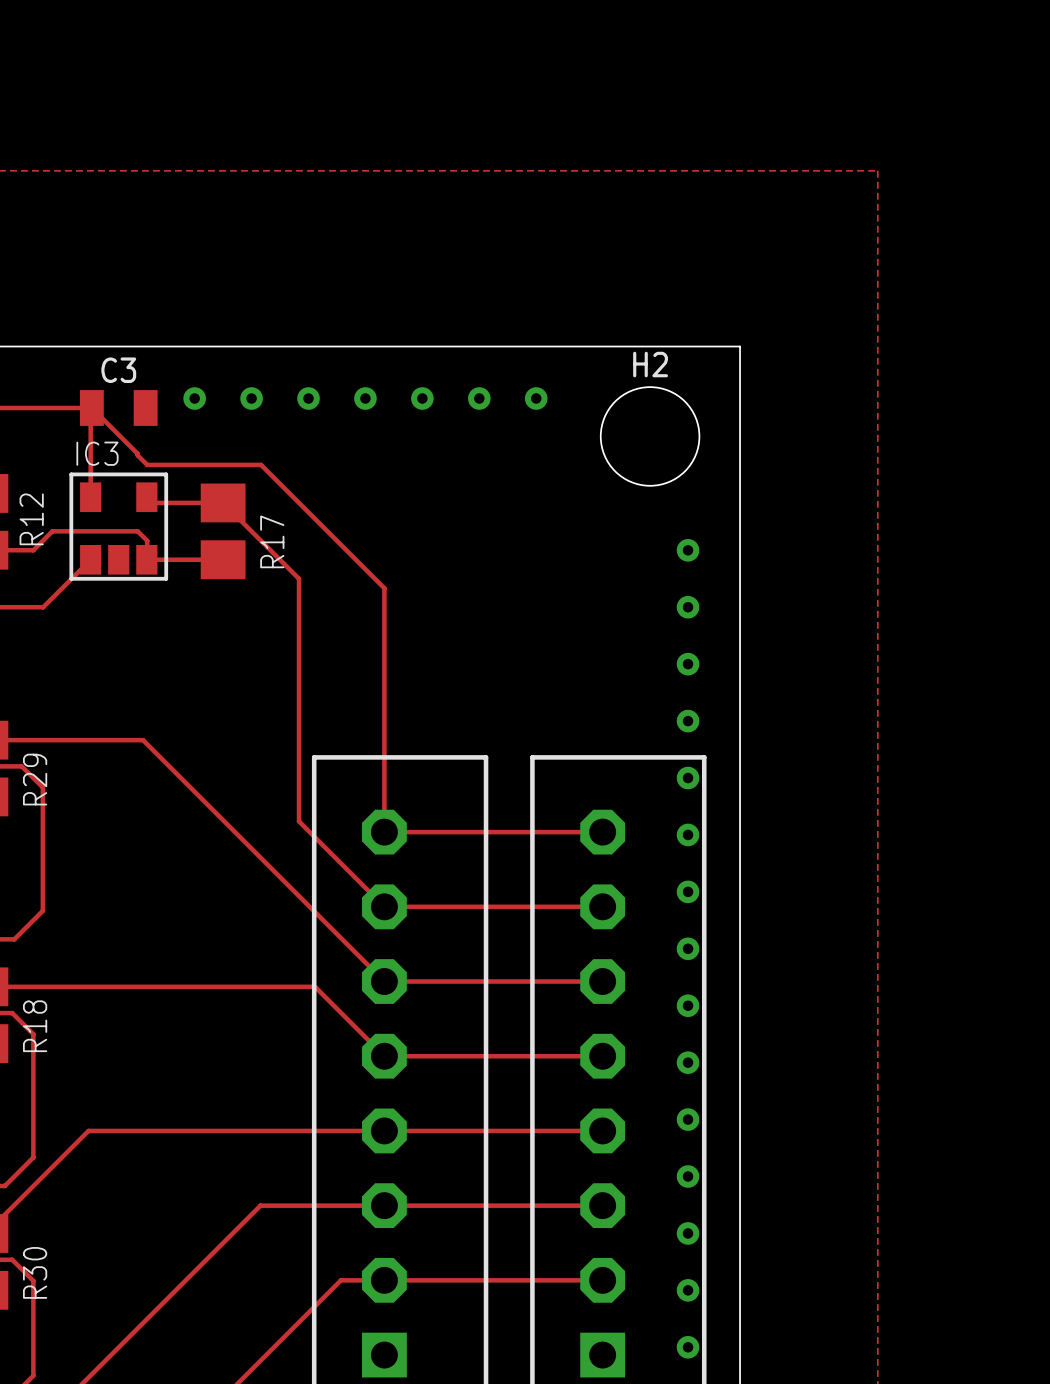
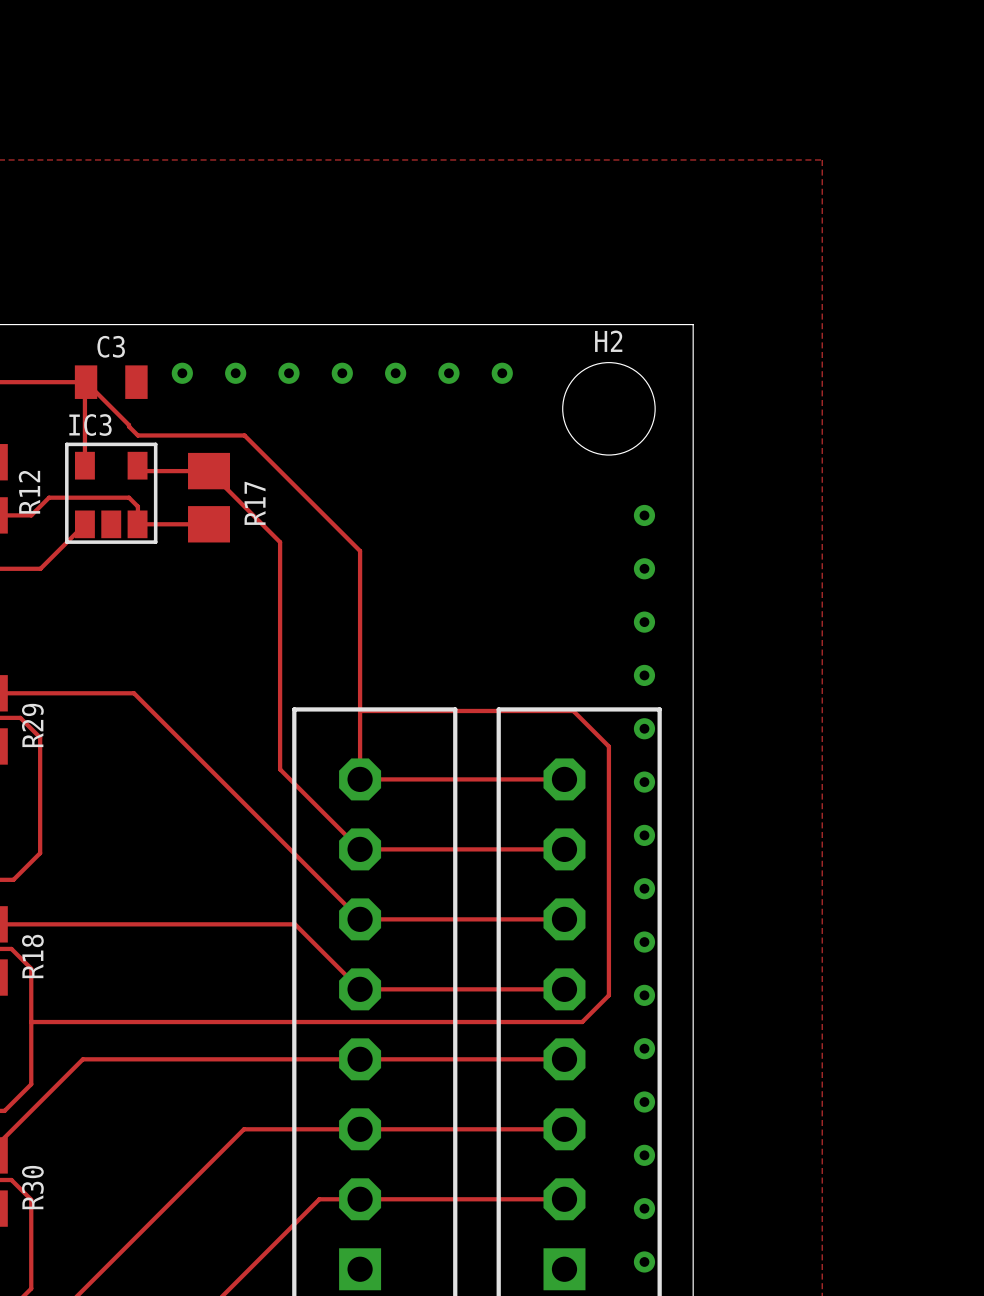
track: none -> (360, 710) (573, 710) (608, 746) (608, 995) (582, 1022) (31, 1022)

